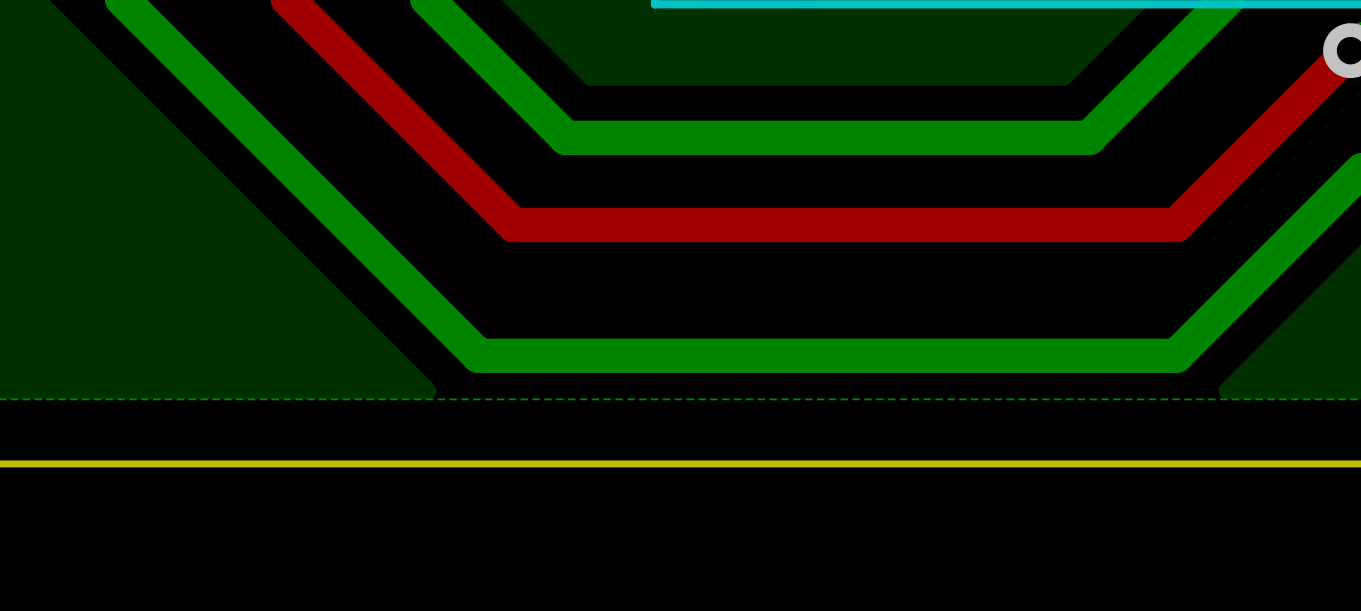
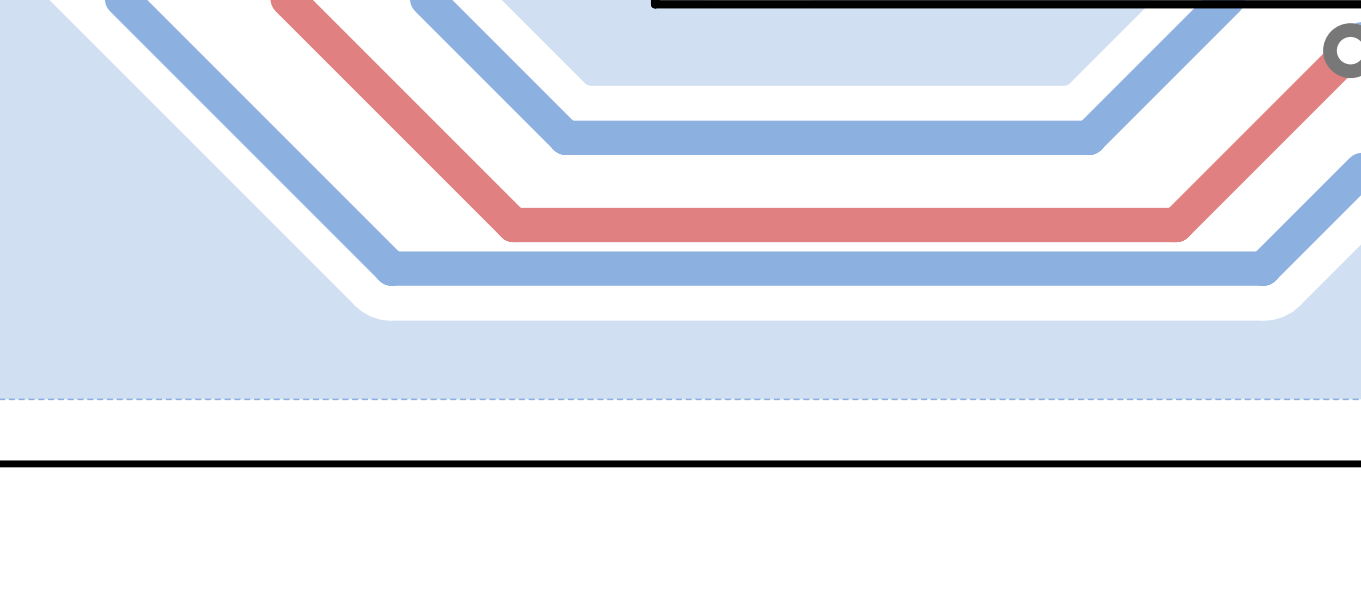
bottom track: (1263, 268) (1176, 355) (478, 355) (391, 268) -> (1263, 268) (391, 268)

